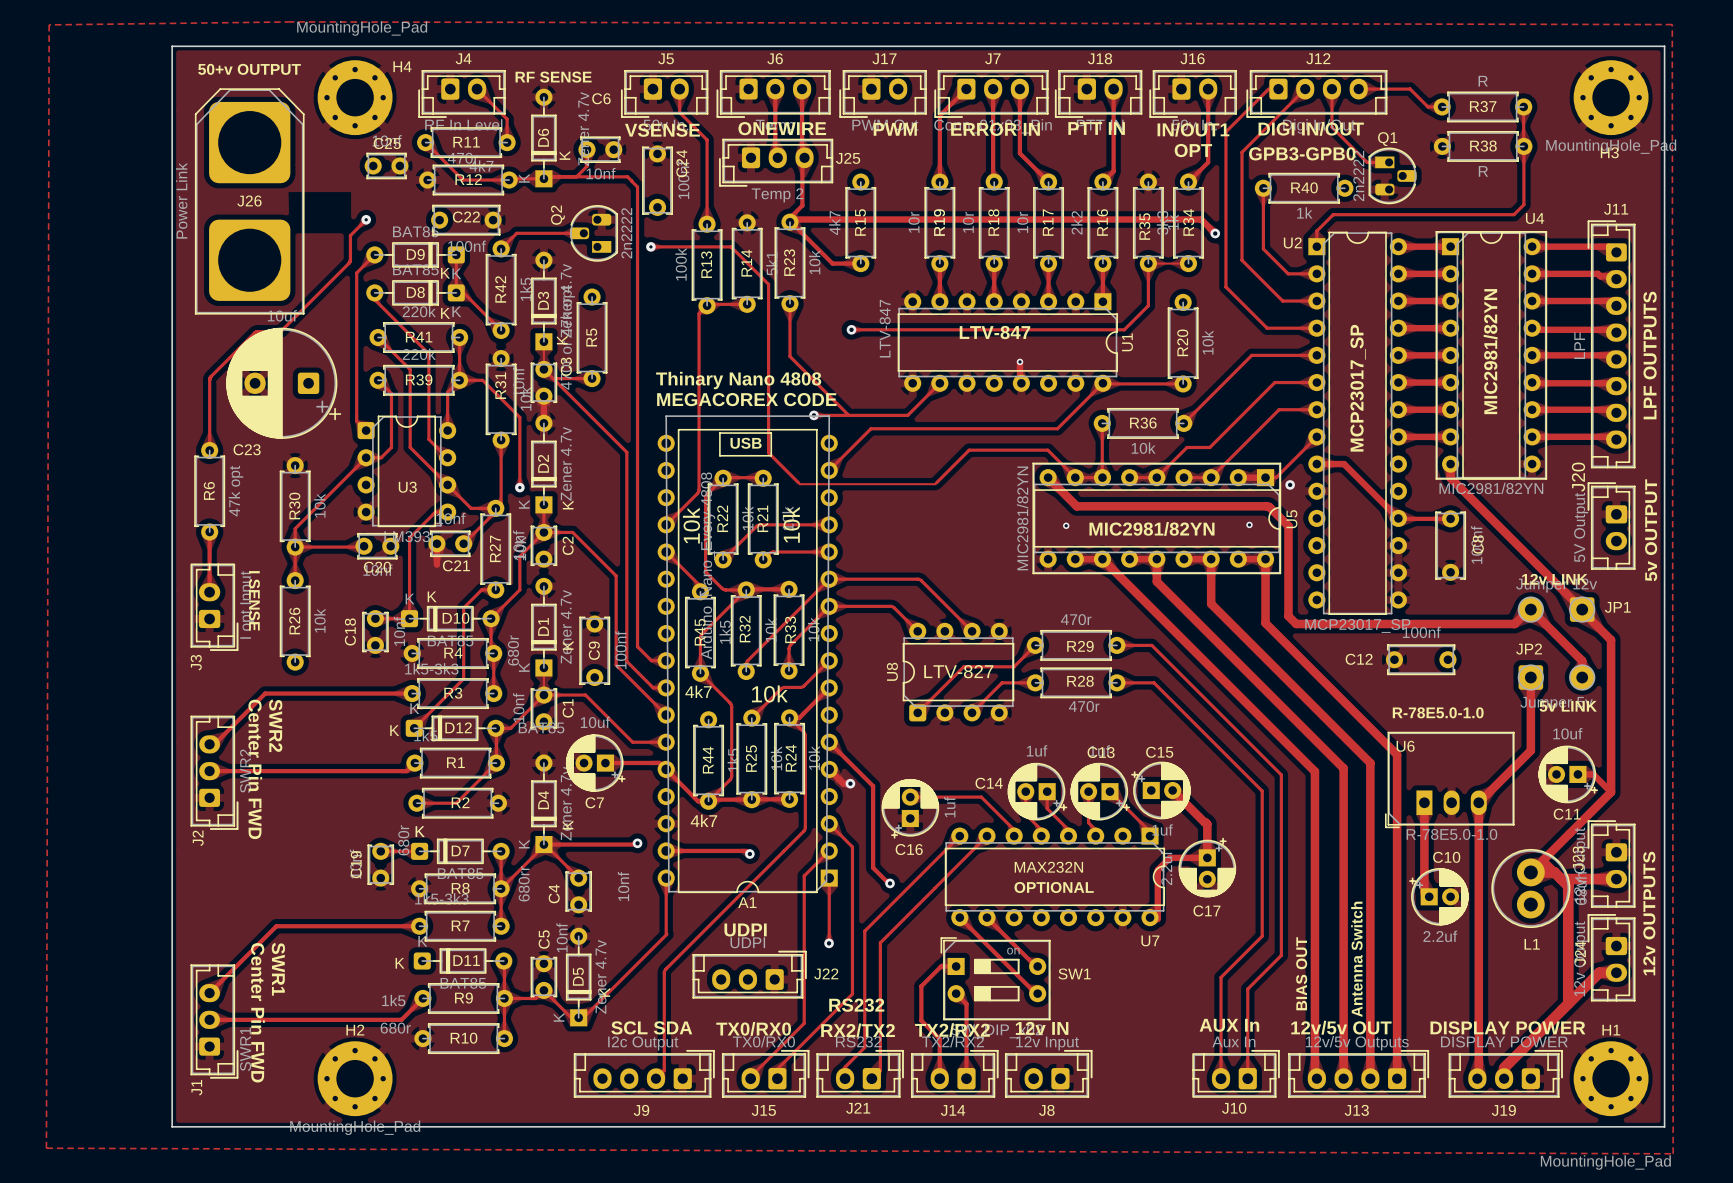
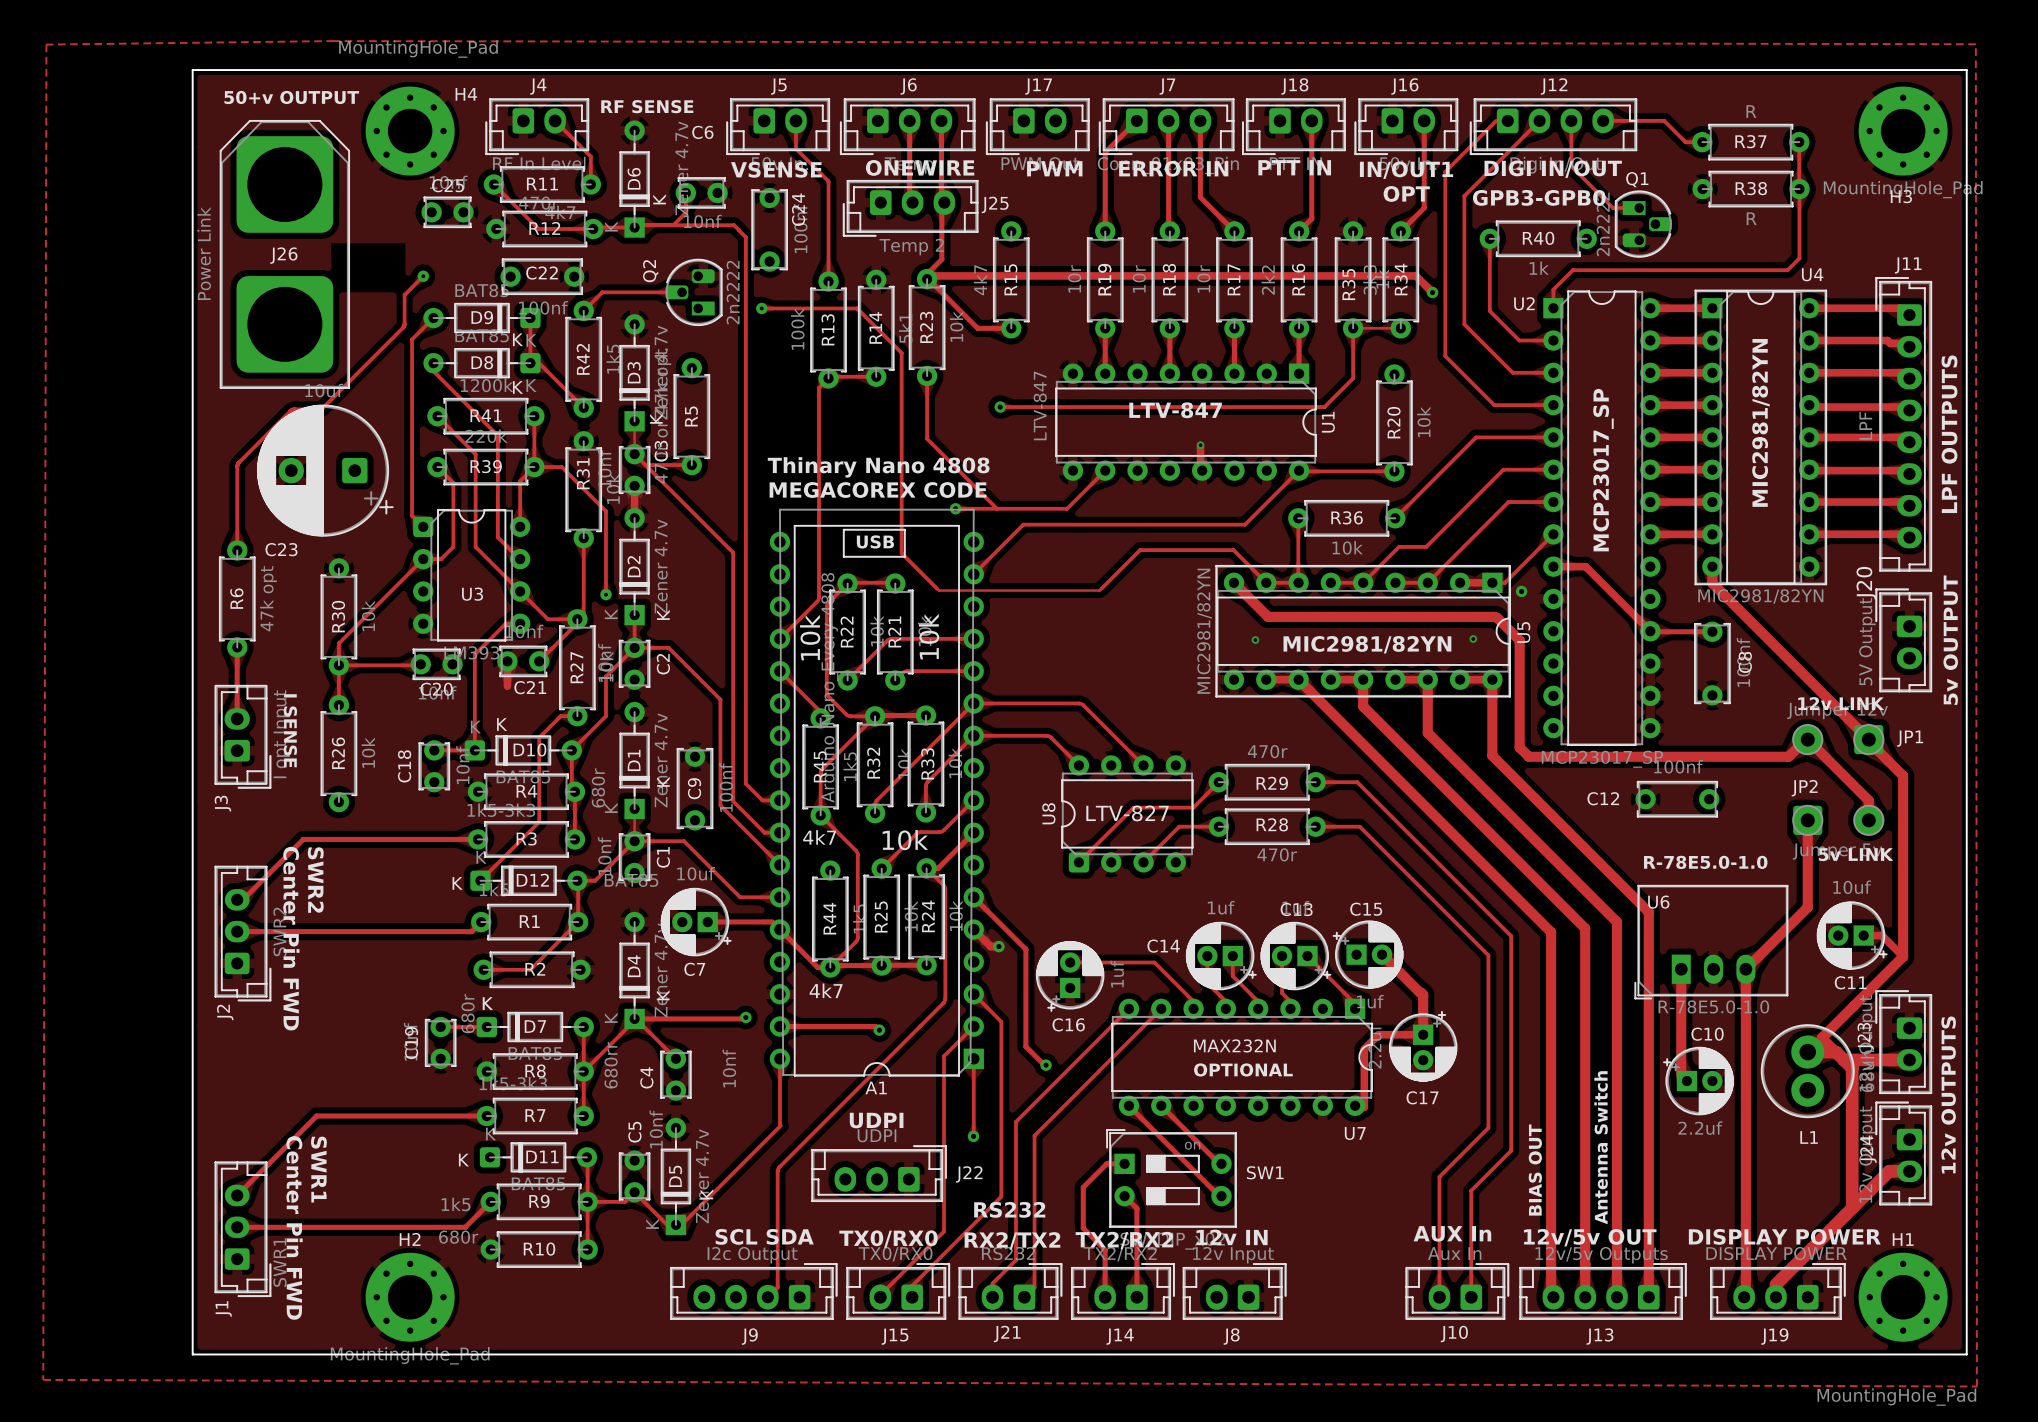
R41 value: 220k (419, 311) -> 1200k (486, 385)

